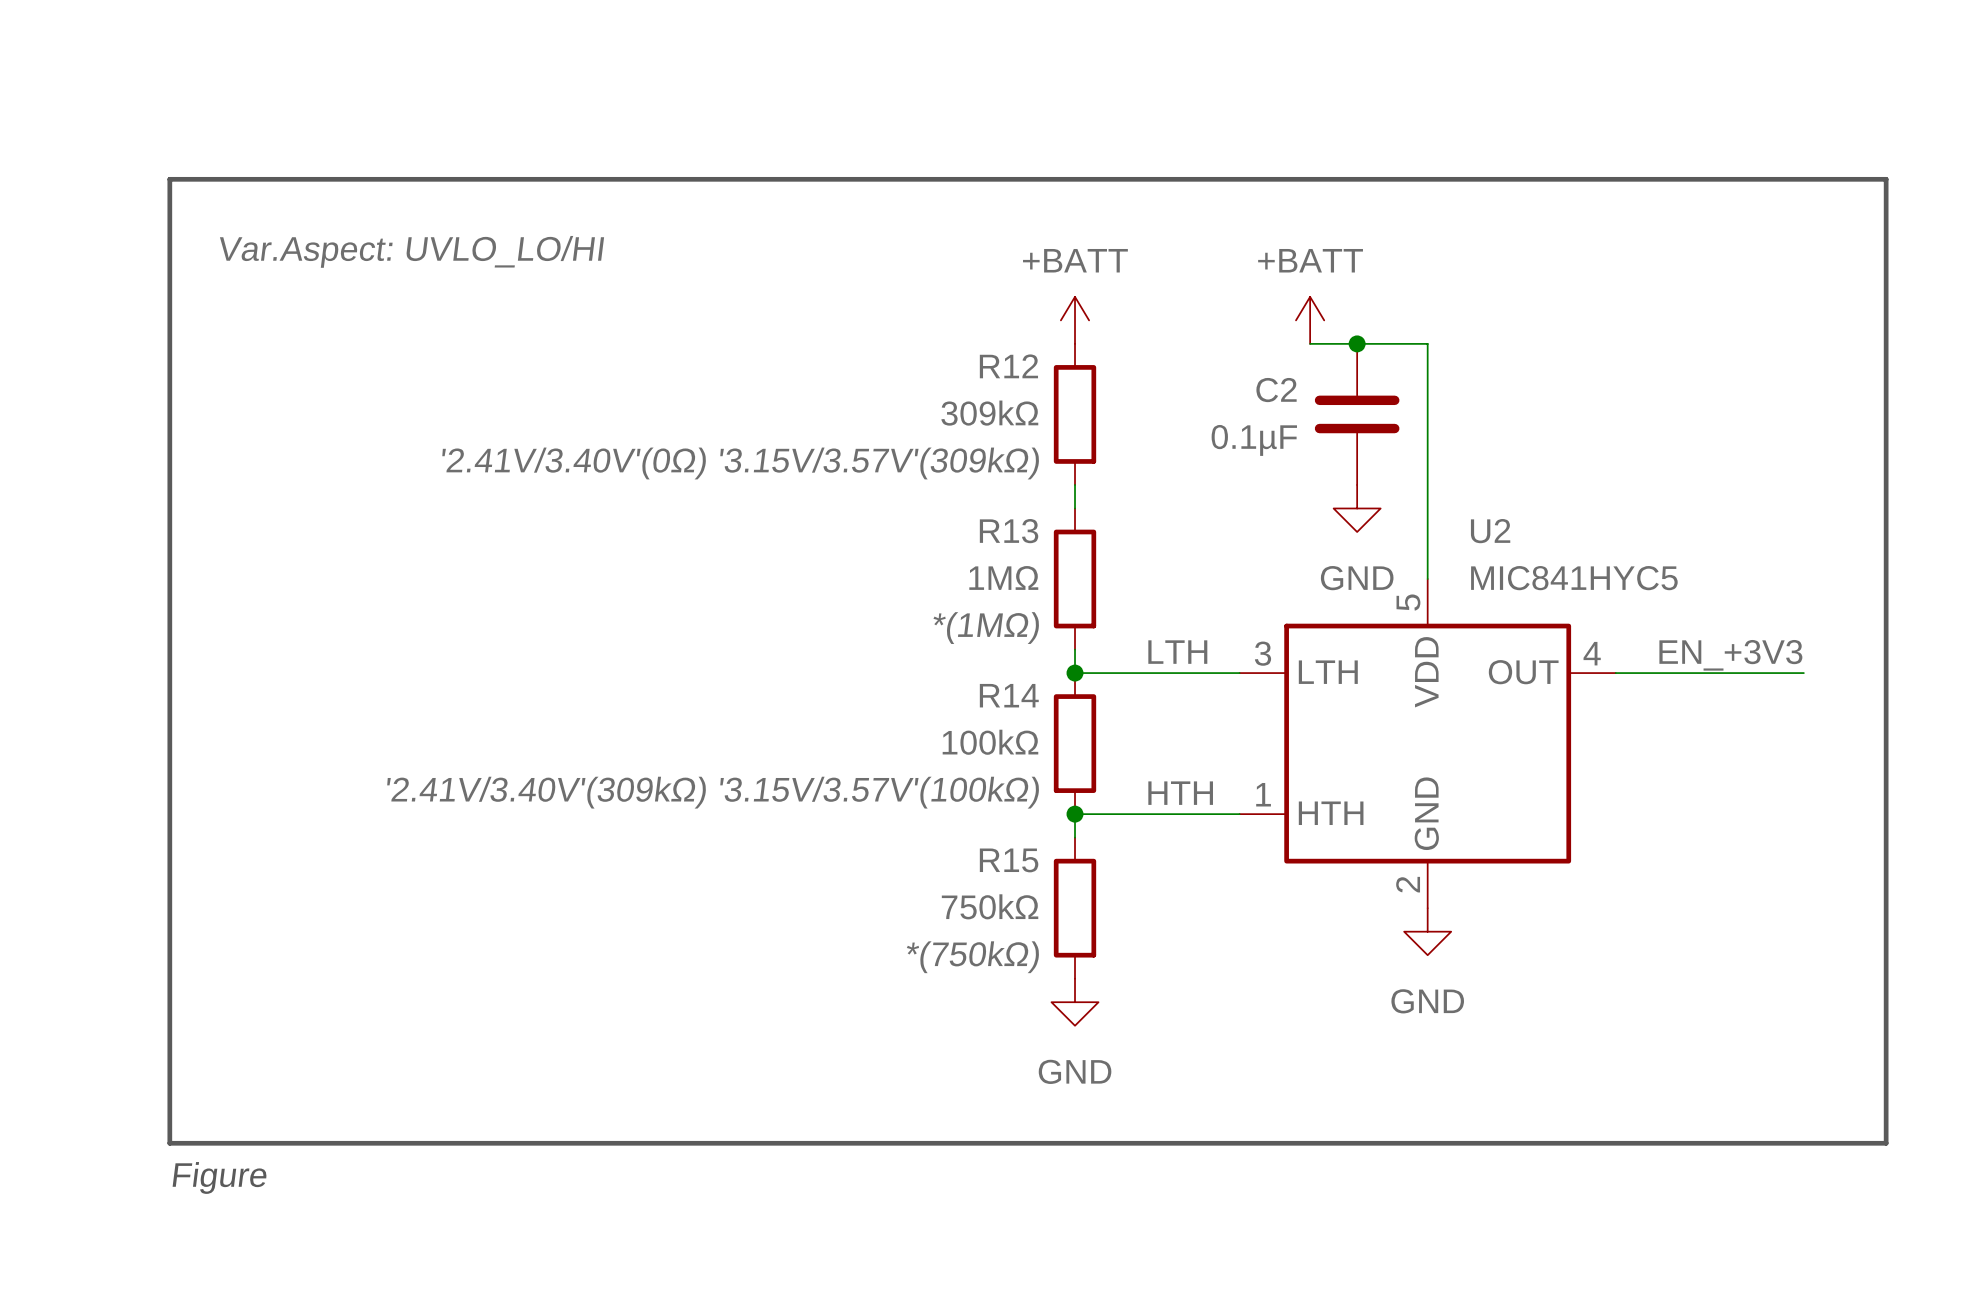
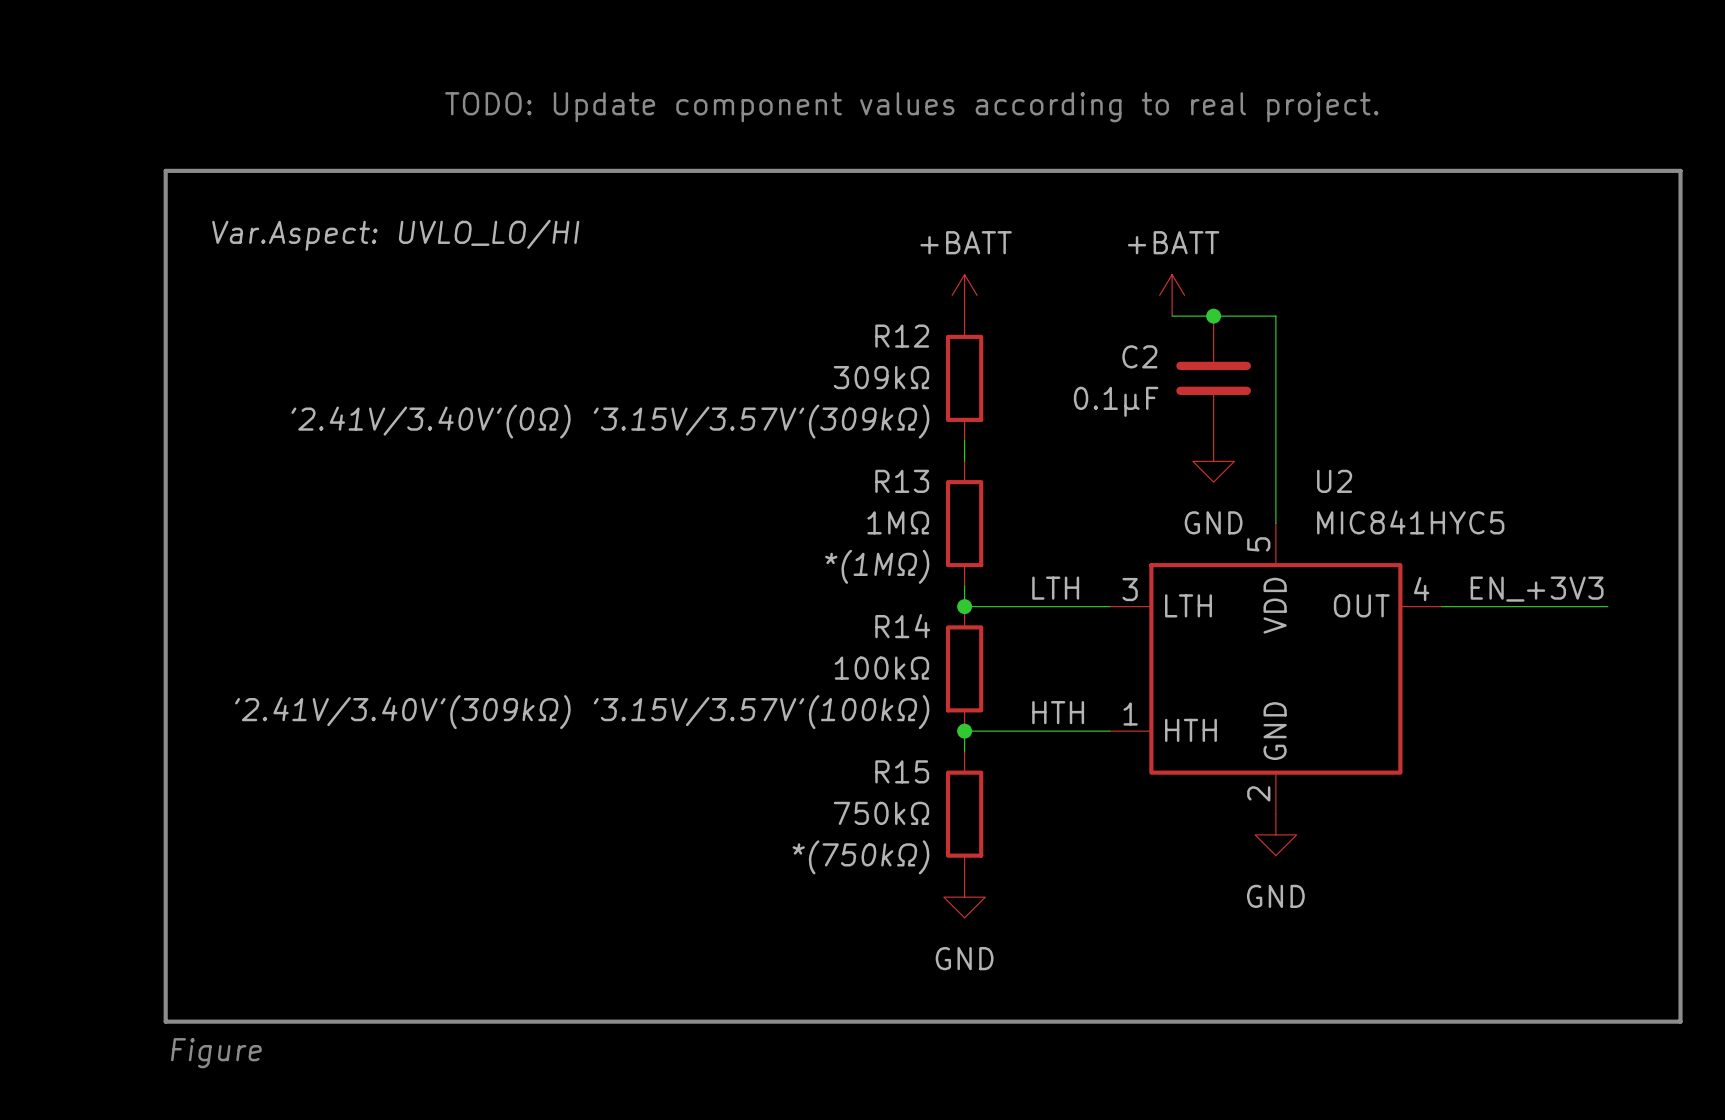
text: none -> TODO: Update component values according to real project. (911, 107)

